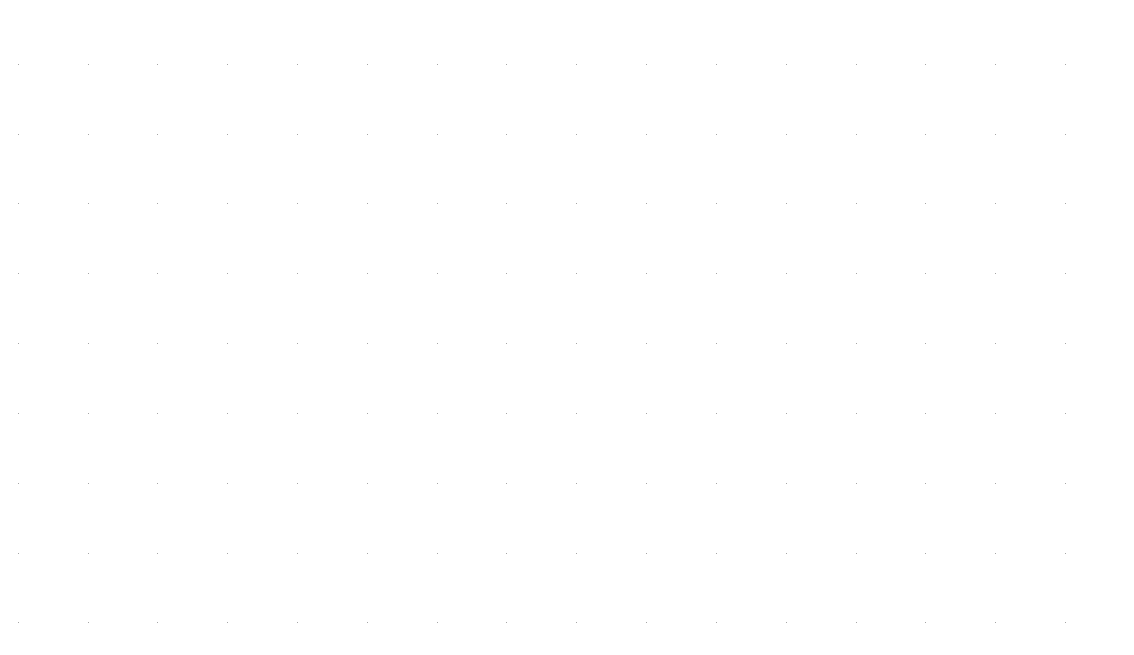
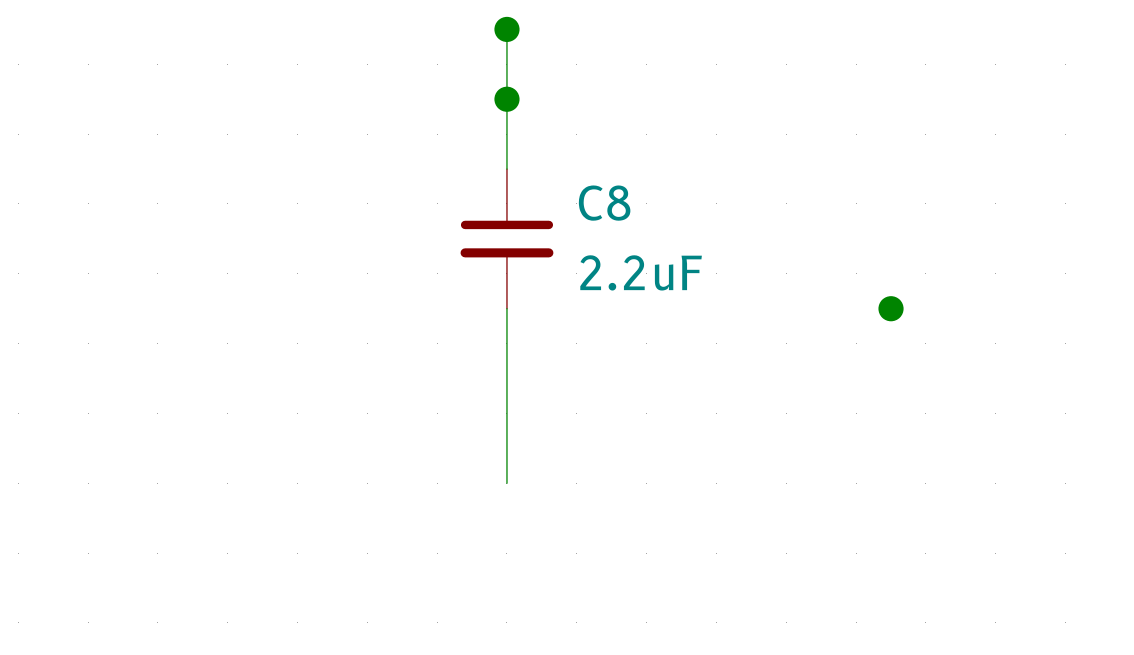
wire: none -> (506, 29) (506, 169)
junction: none -> (506, 29)
junction: none -> (506, 99)
C8: none -> 2.2uF (506, 238)
wire: none -> (506, 308) (506, 483)
junction: none -> (891, 308)

